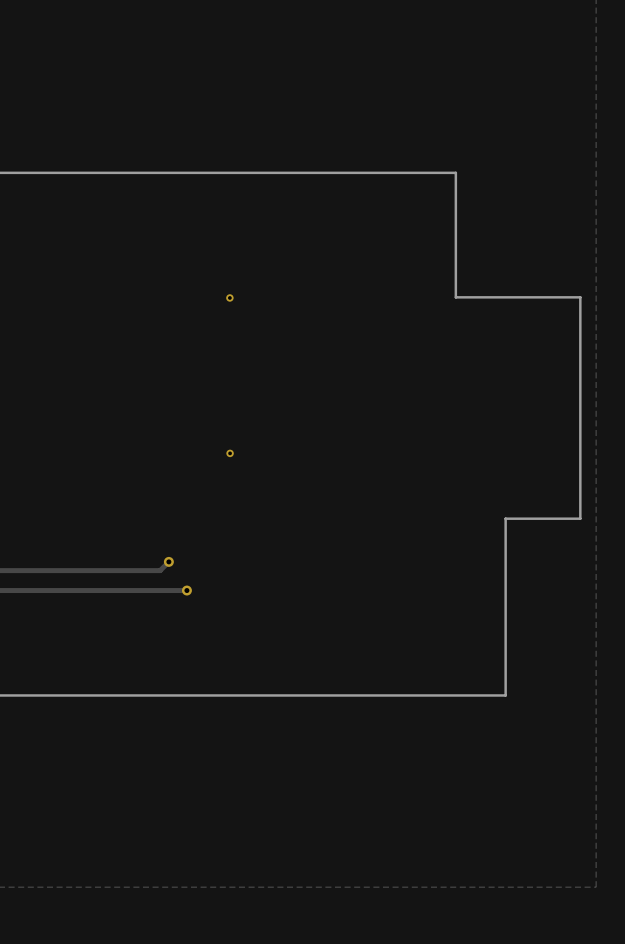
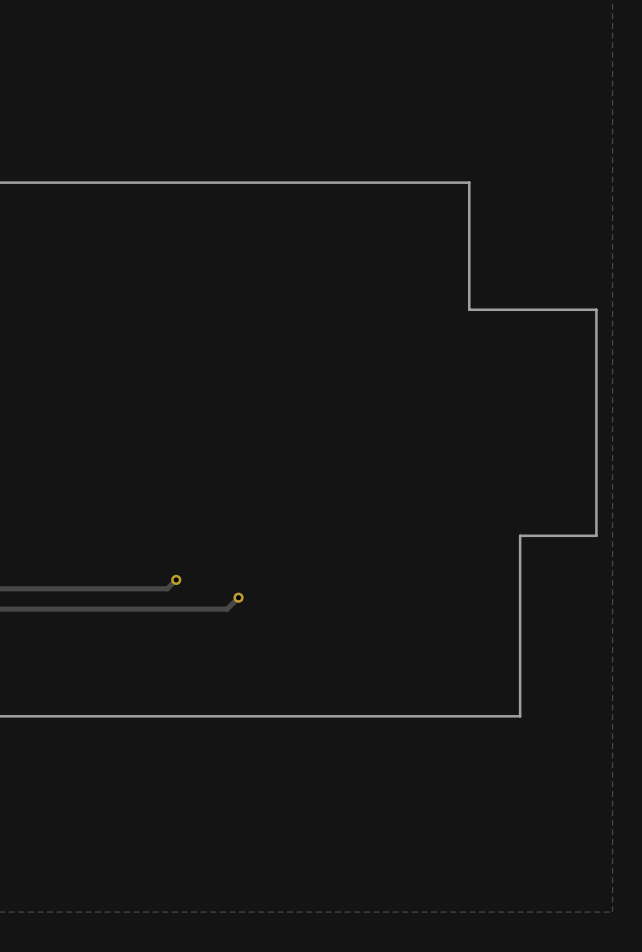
via: (229, 297) -> none
via: (230, 453) -> none
track: none -> (238, 597) (227, 609) (194, 609)
via position: (186, 590) -> (238, 597)

